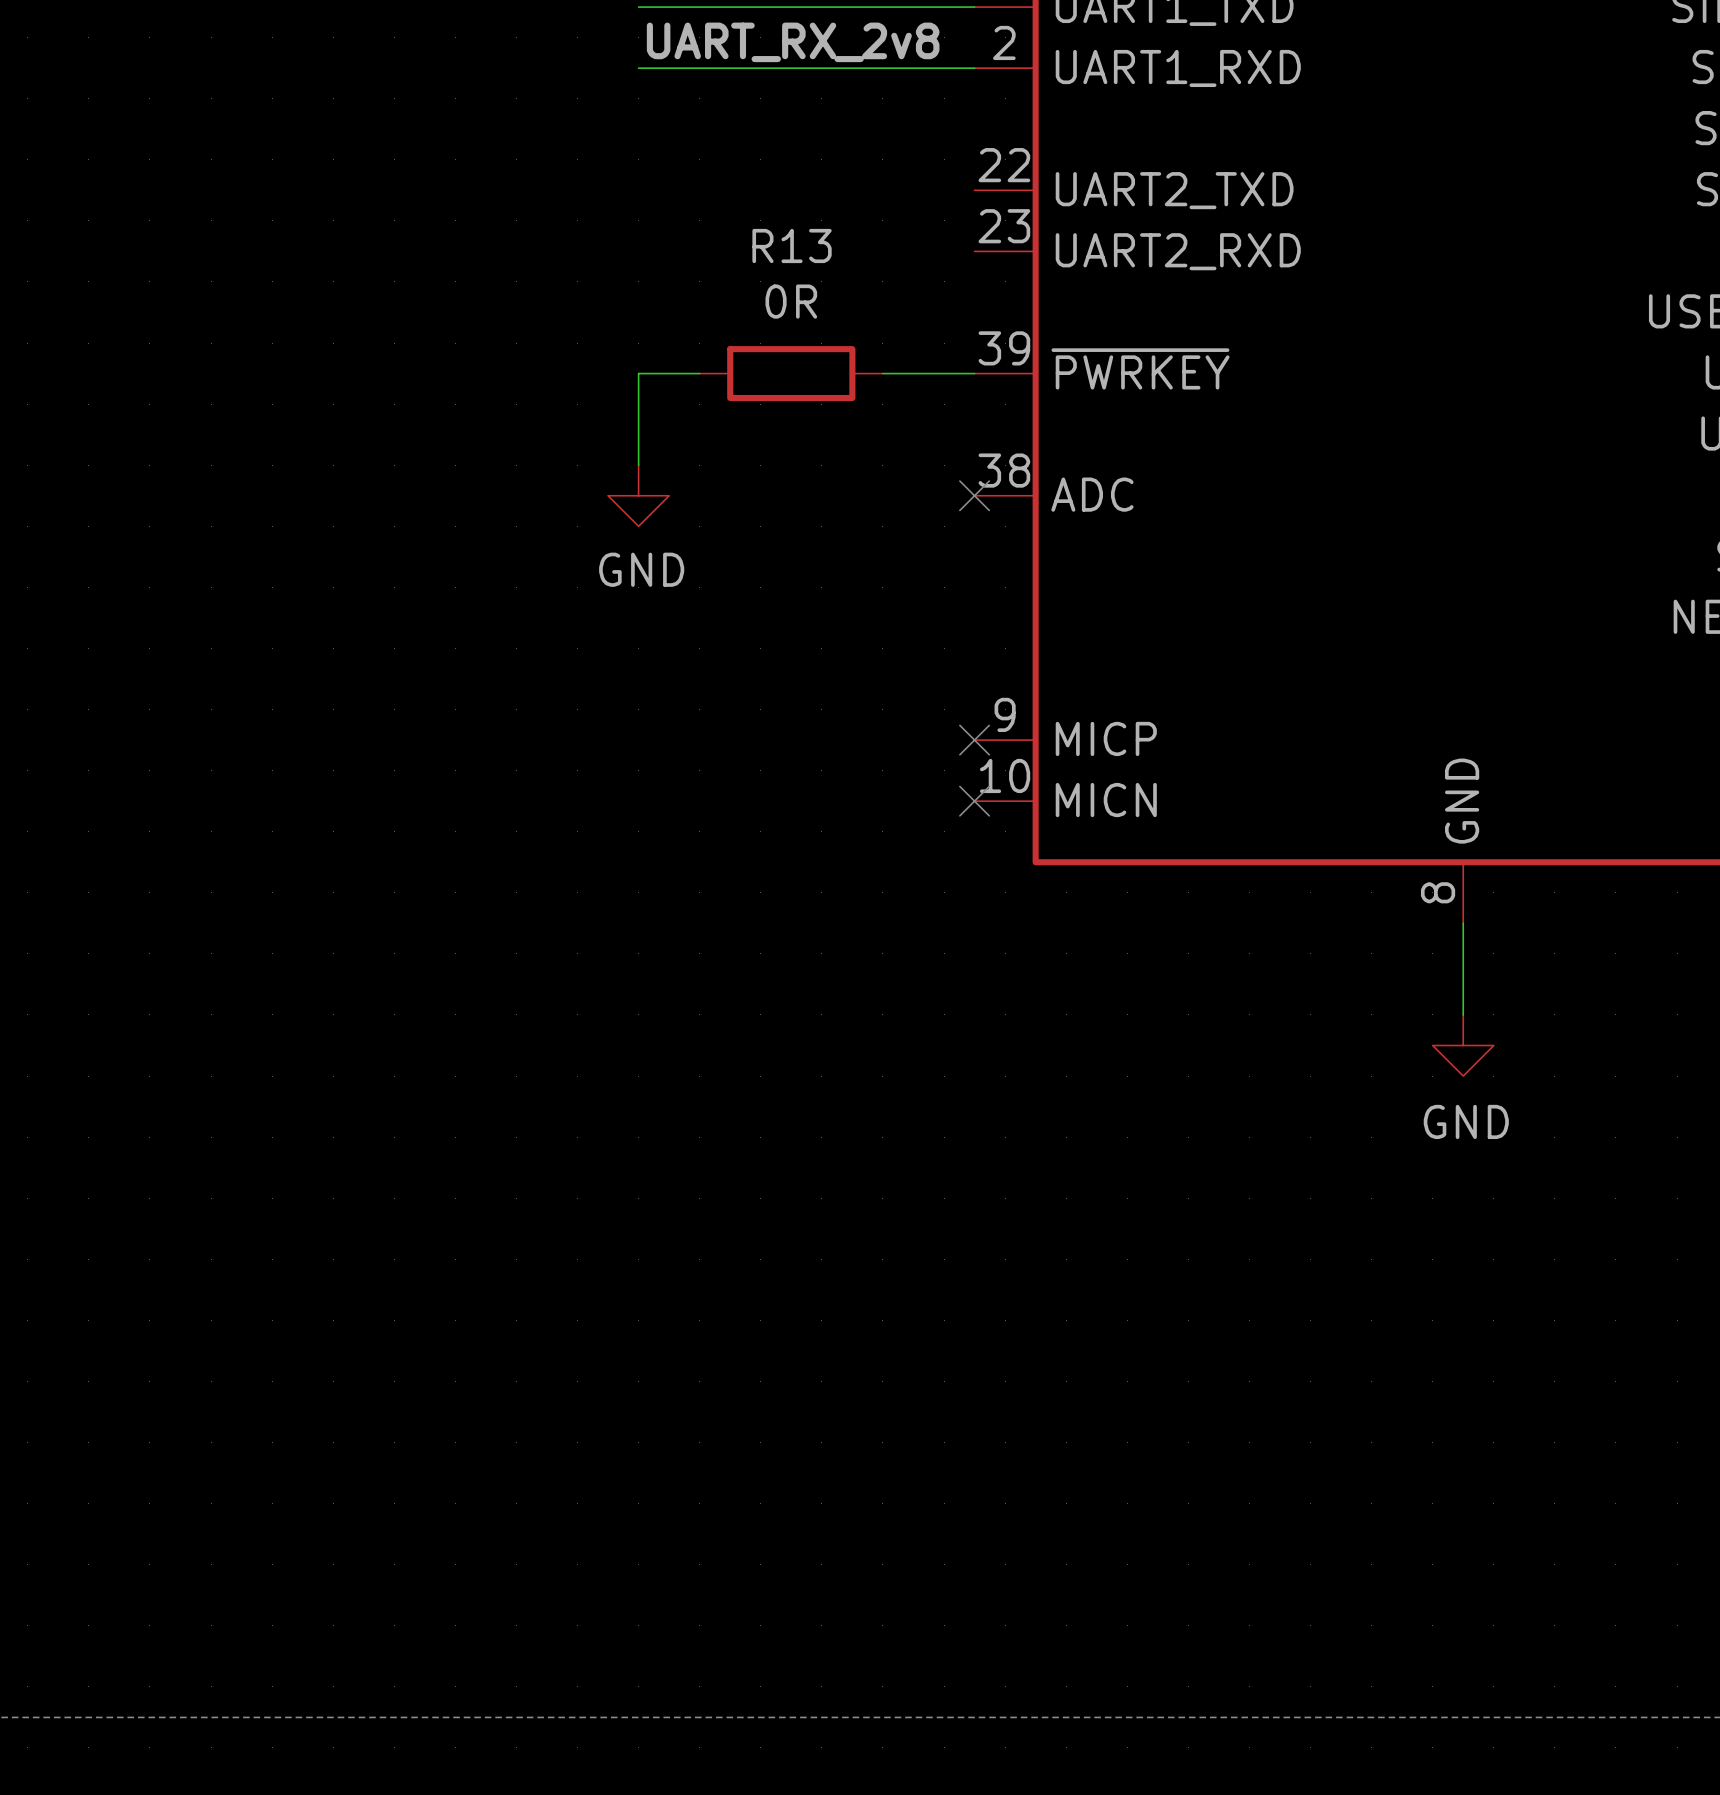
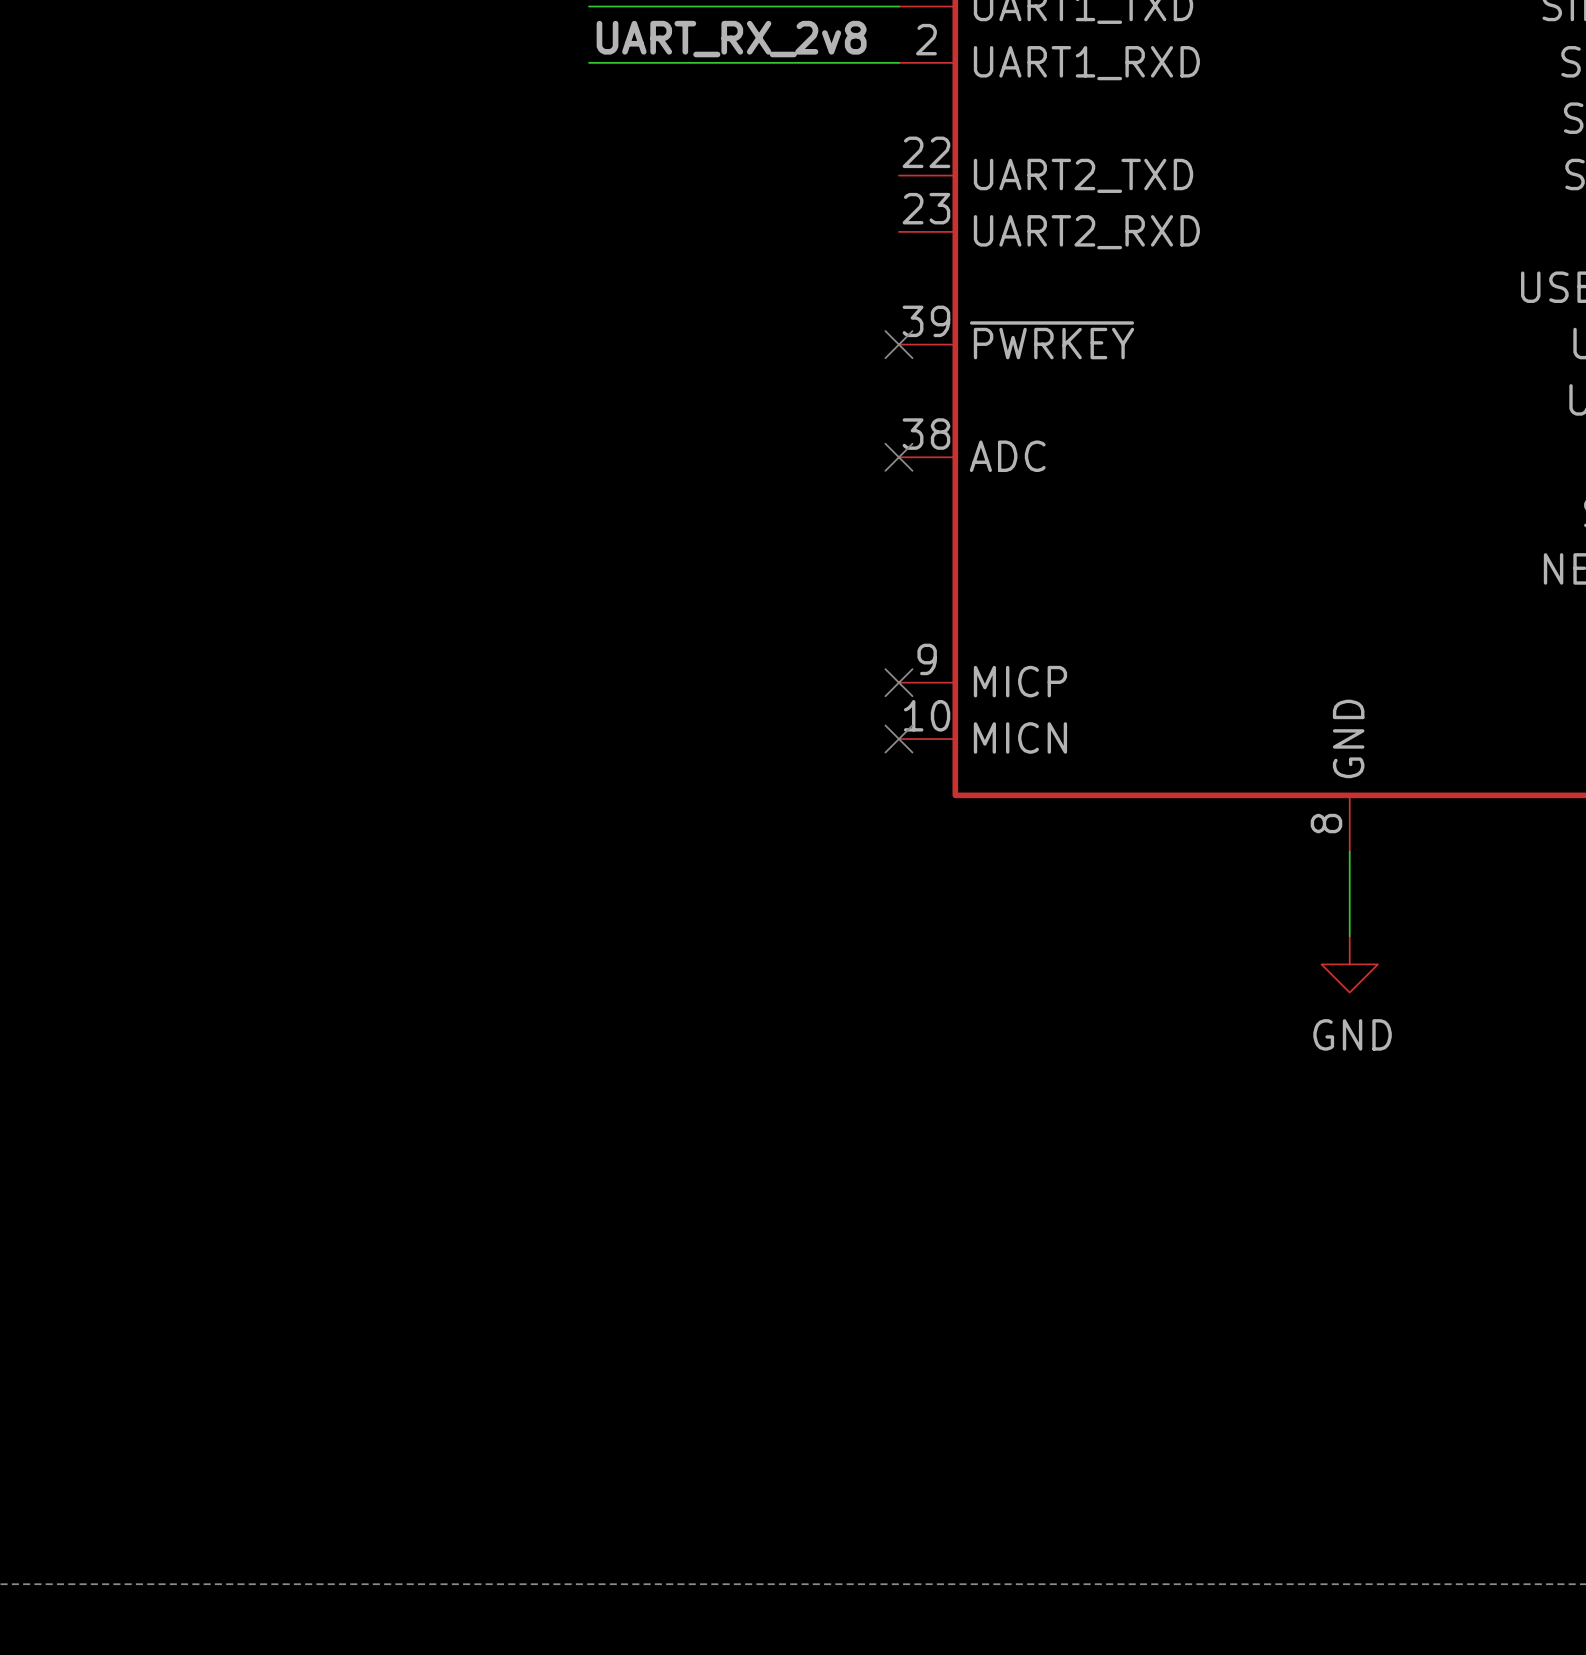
wire: (699, 373) (638, 373) (638, 465) -> none
R13: 0R (791, 373) -> none
wire: (882, 373) (974, 373) -> none
no-connect mark: none -> (898, 344)
power symbol: GND (638, 495) -> none

